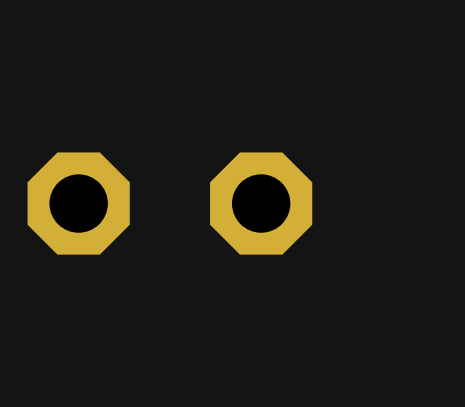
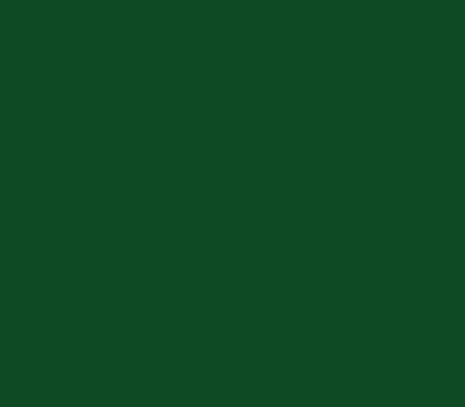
part: (169, 203) -> none

